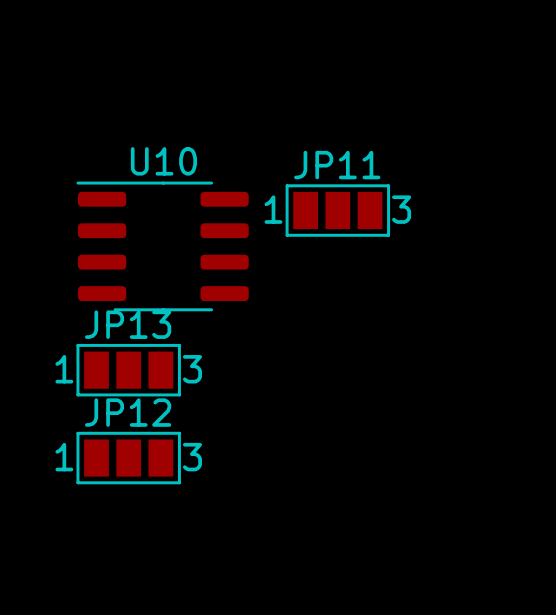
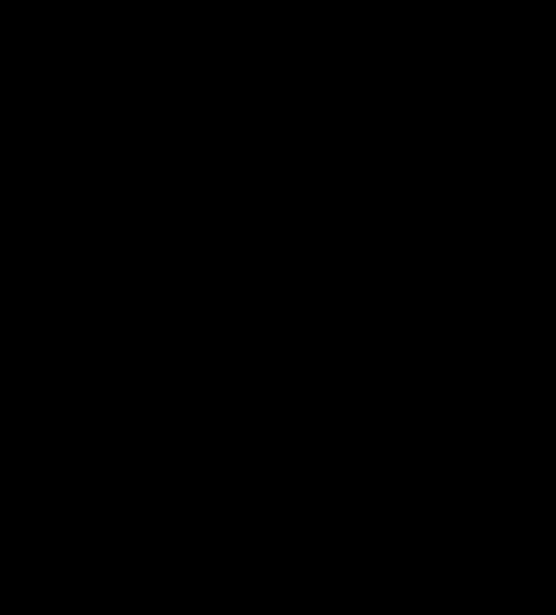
JP11: (337, 210) -> none
U10: (162, 246) -> none
JP13: (128, 370) -> none
JP12: (128, 458) -> none

